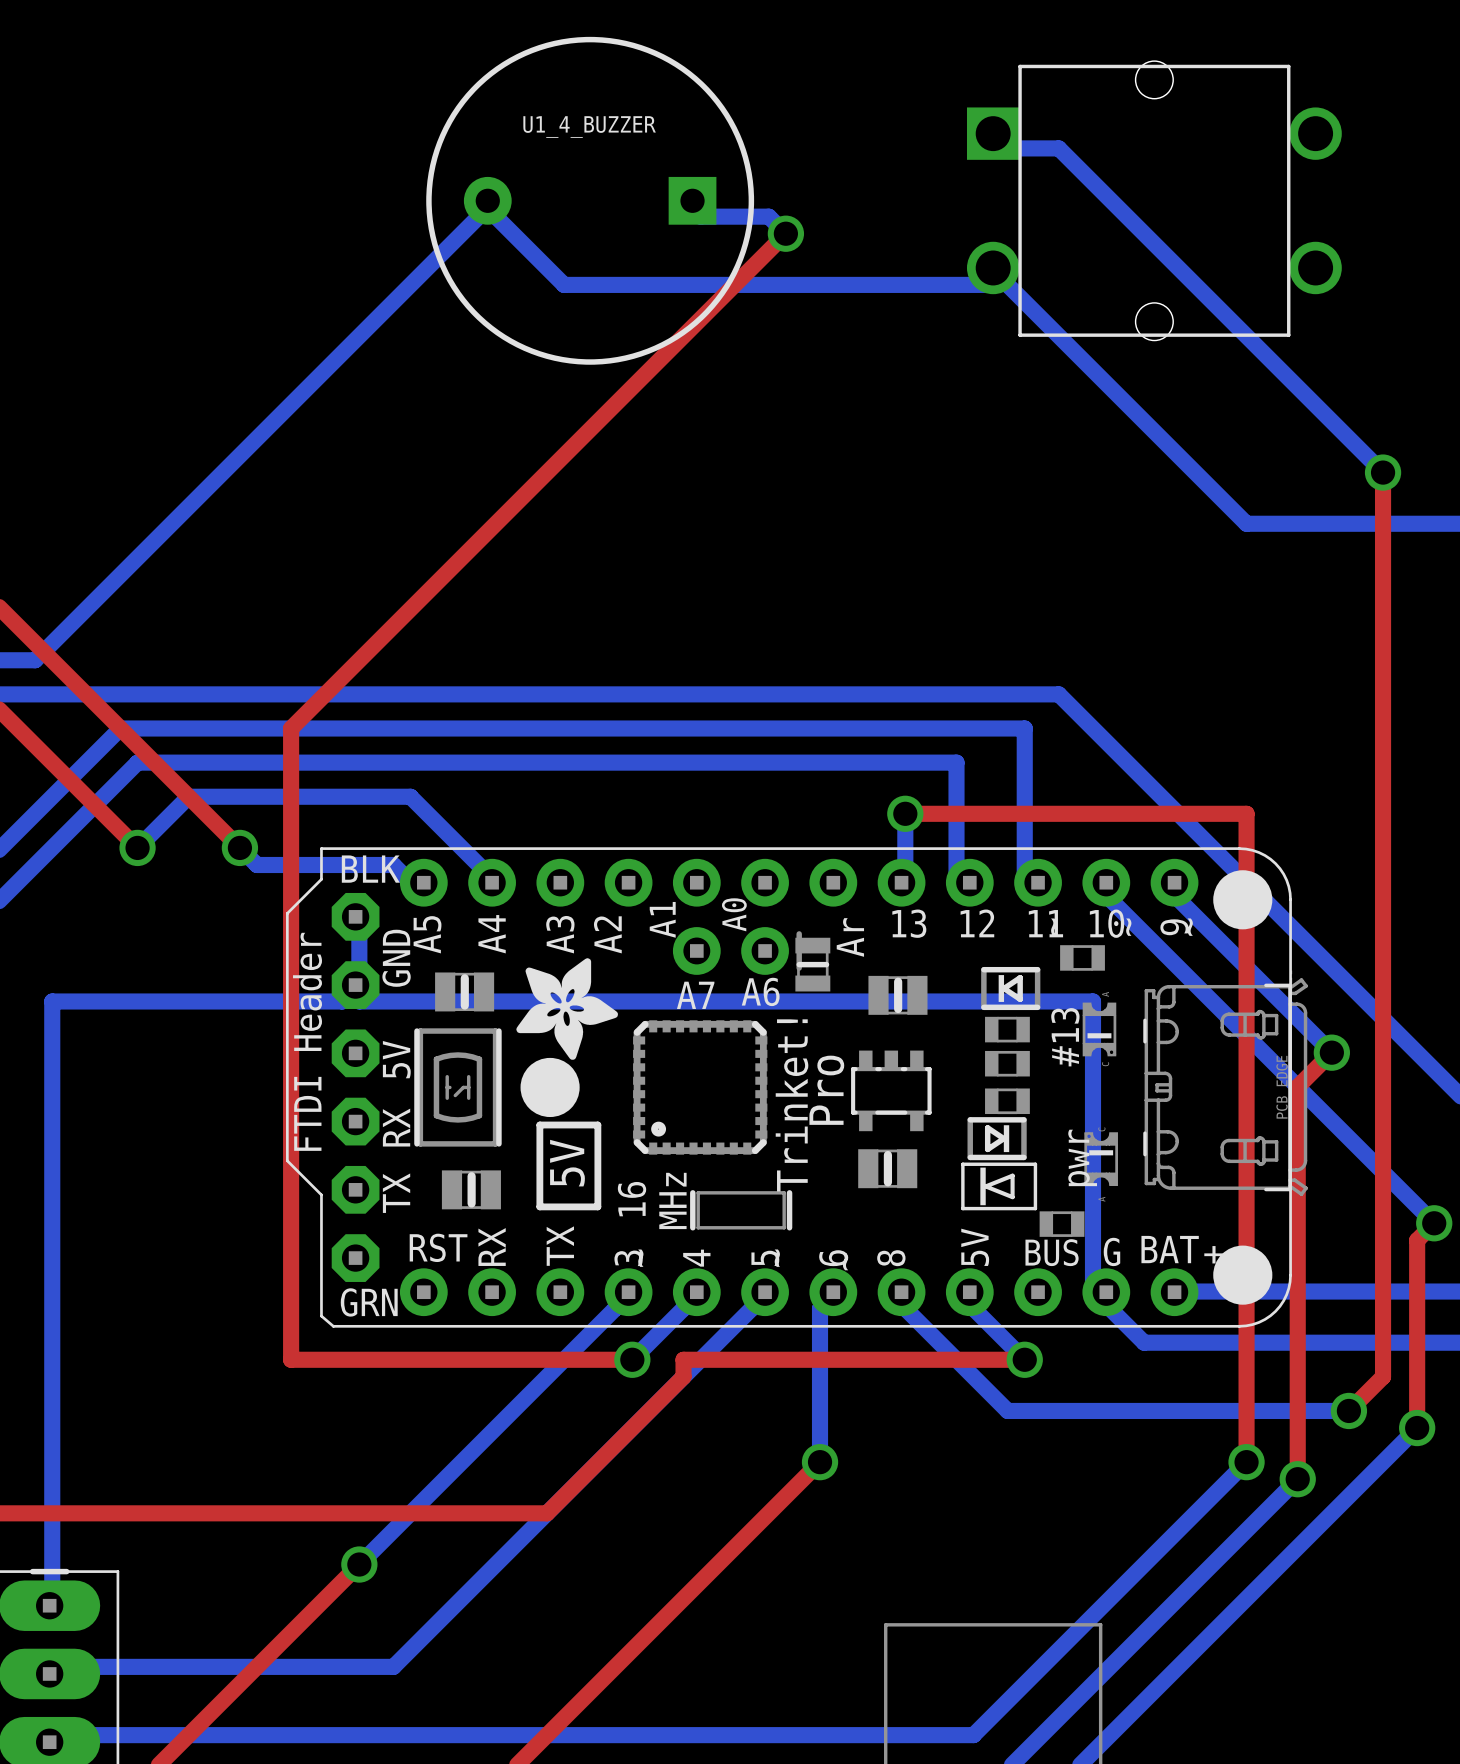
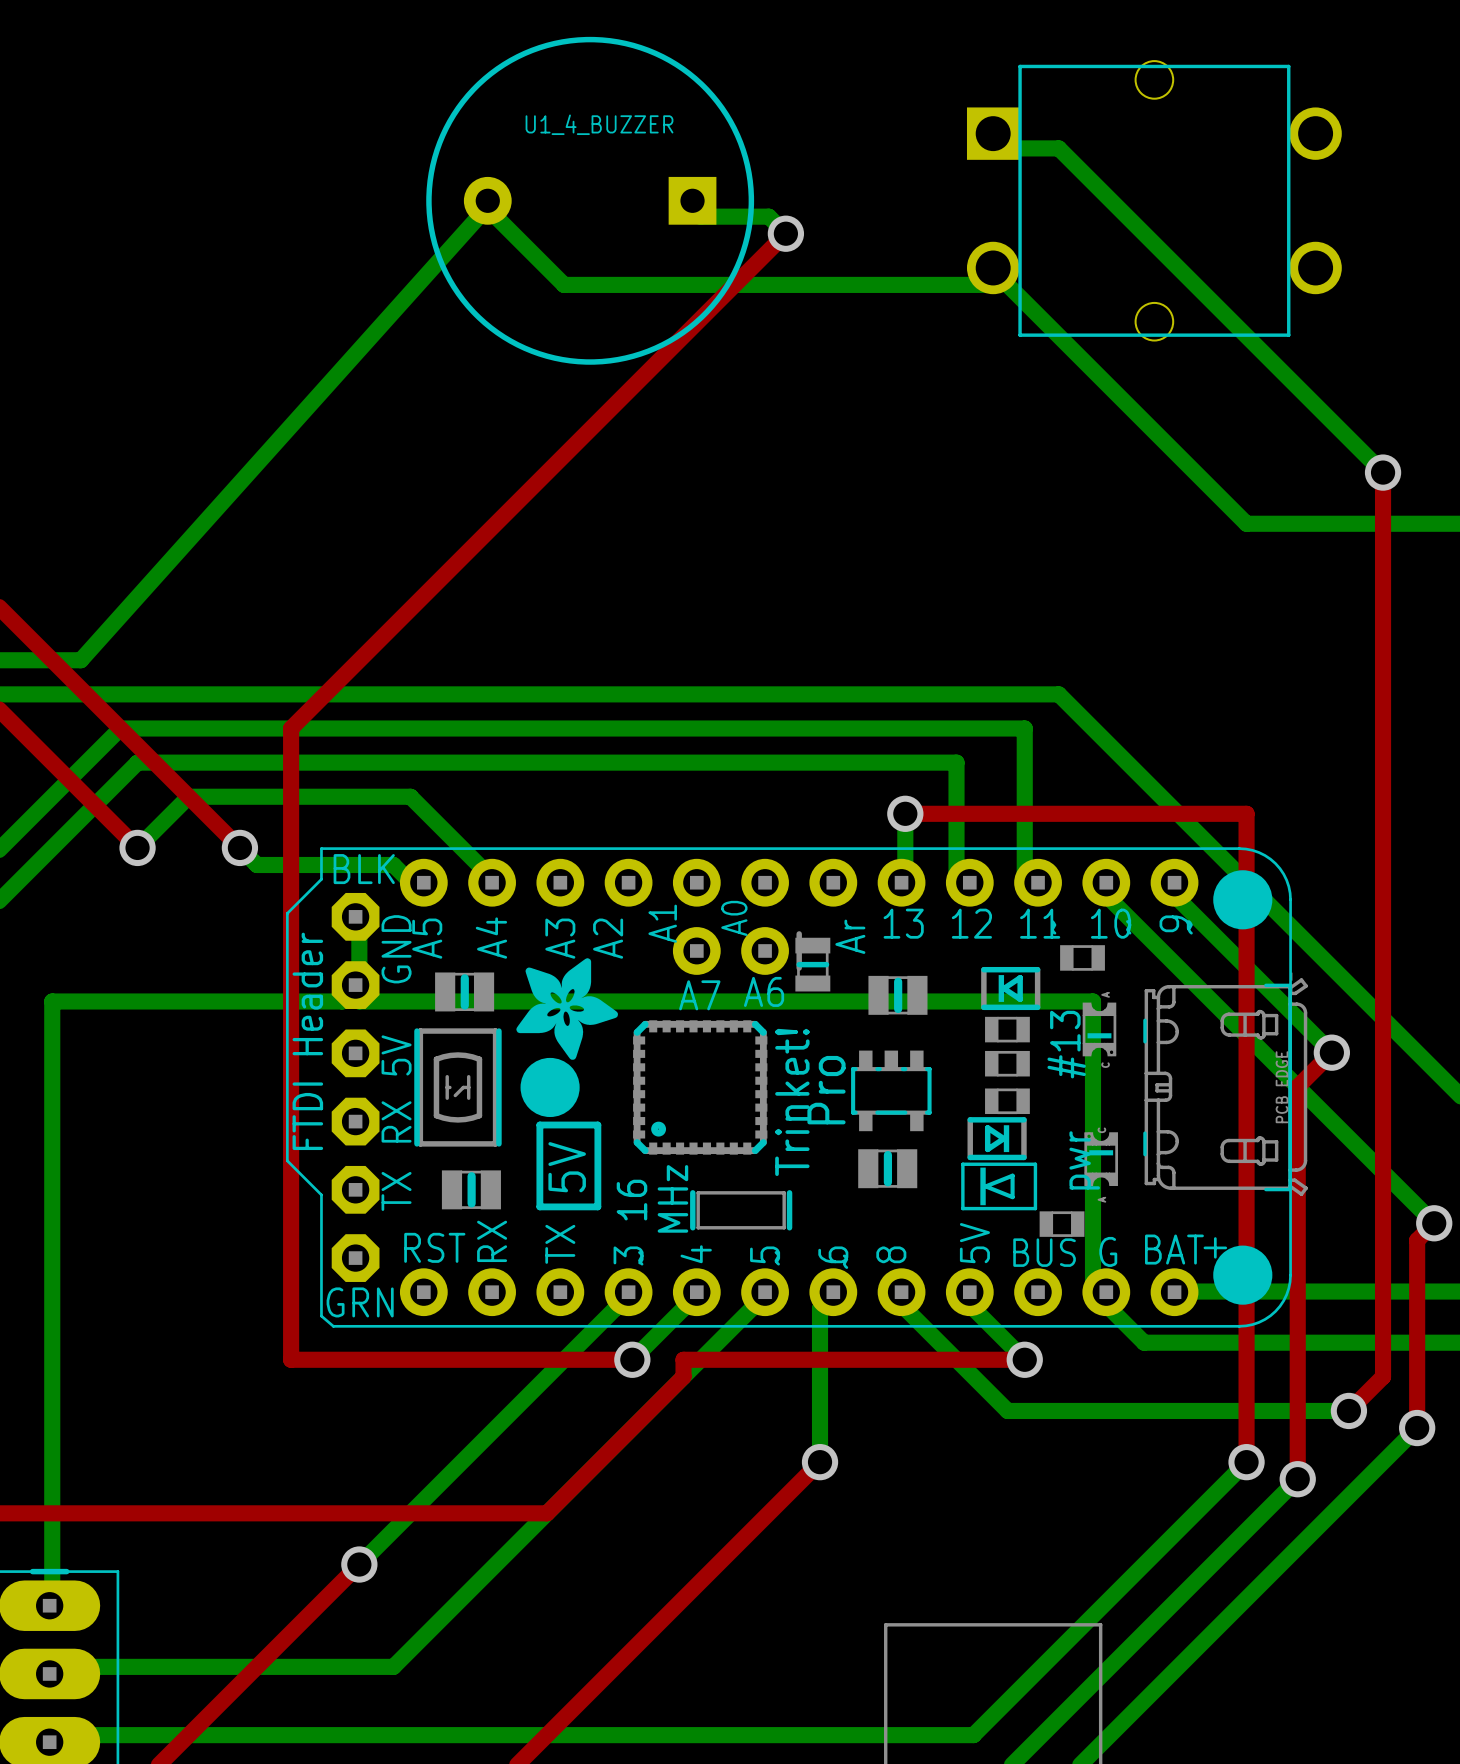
bottom track: (478, 216) (35, 660) -> (478, 216) (80, 660) (35, 660)

